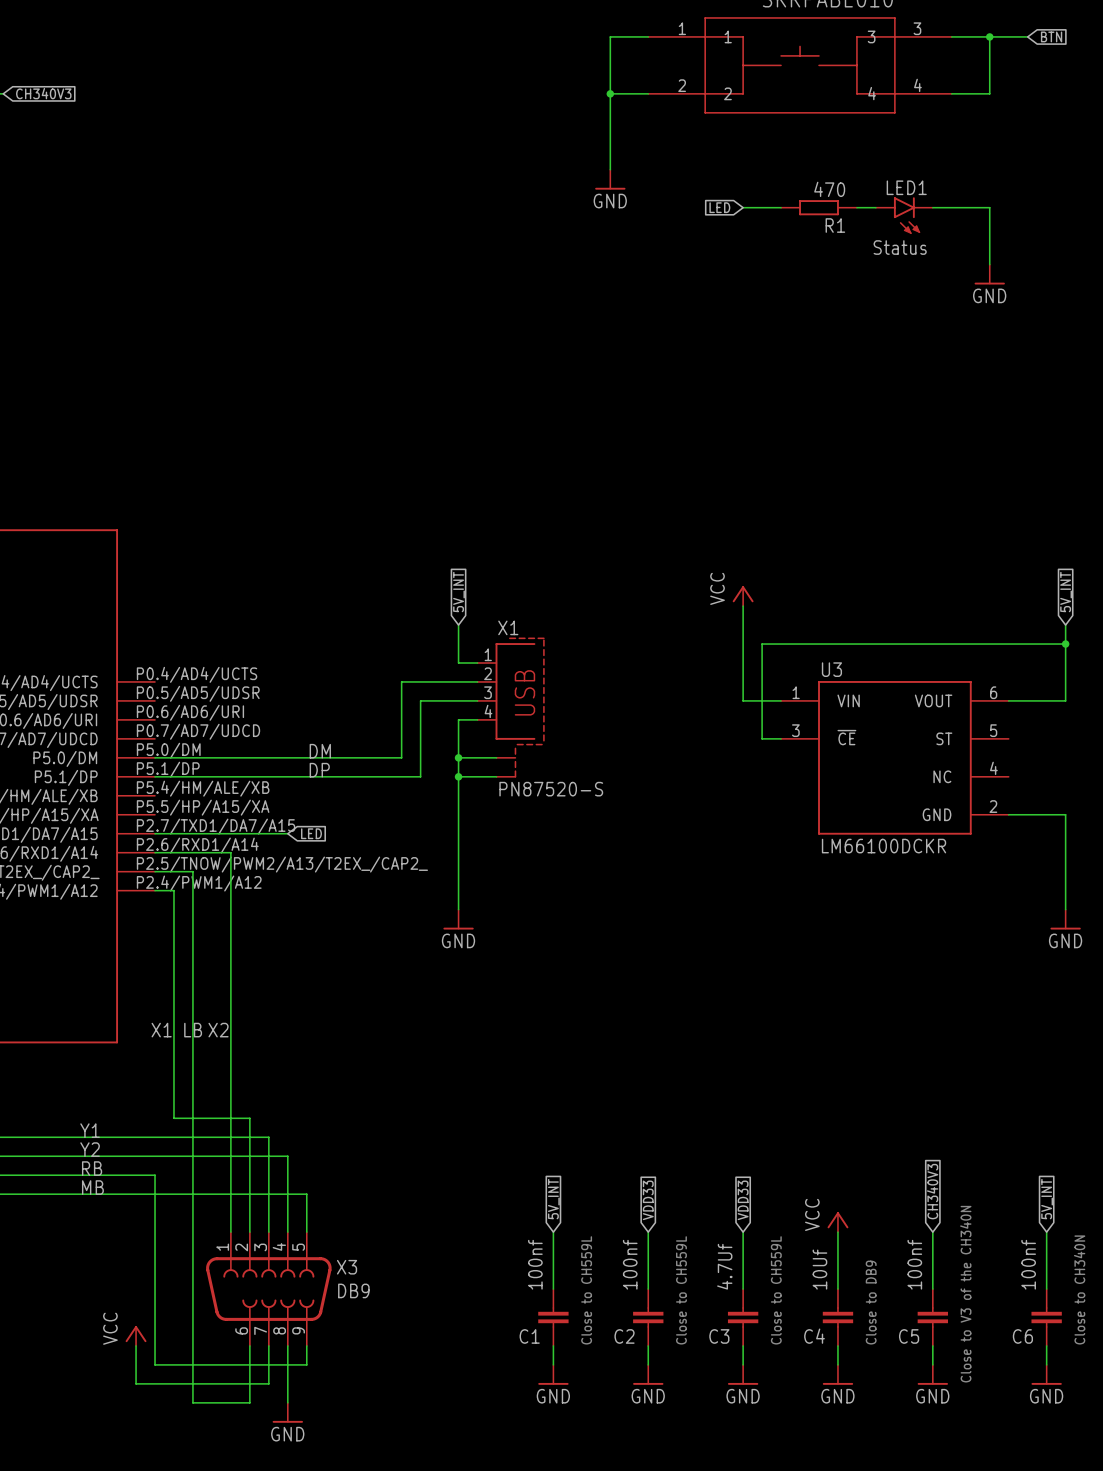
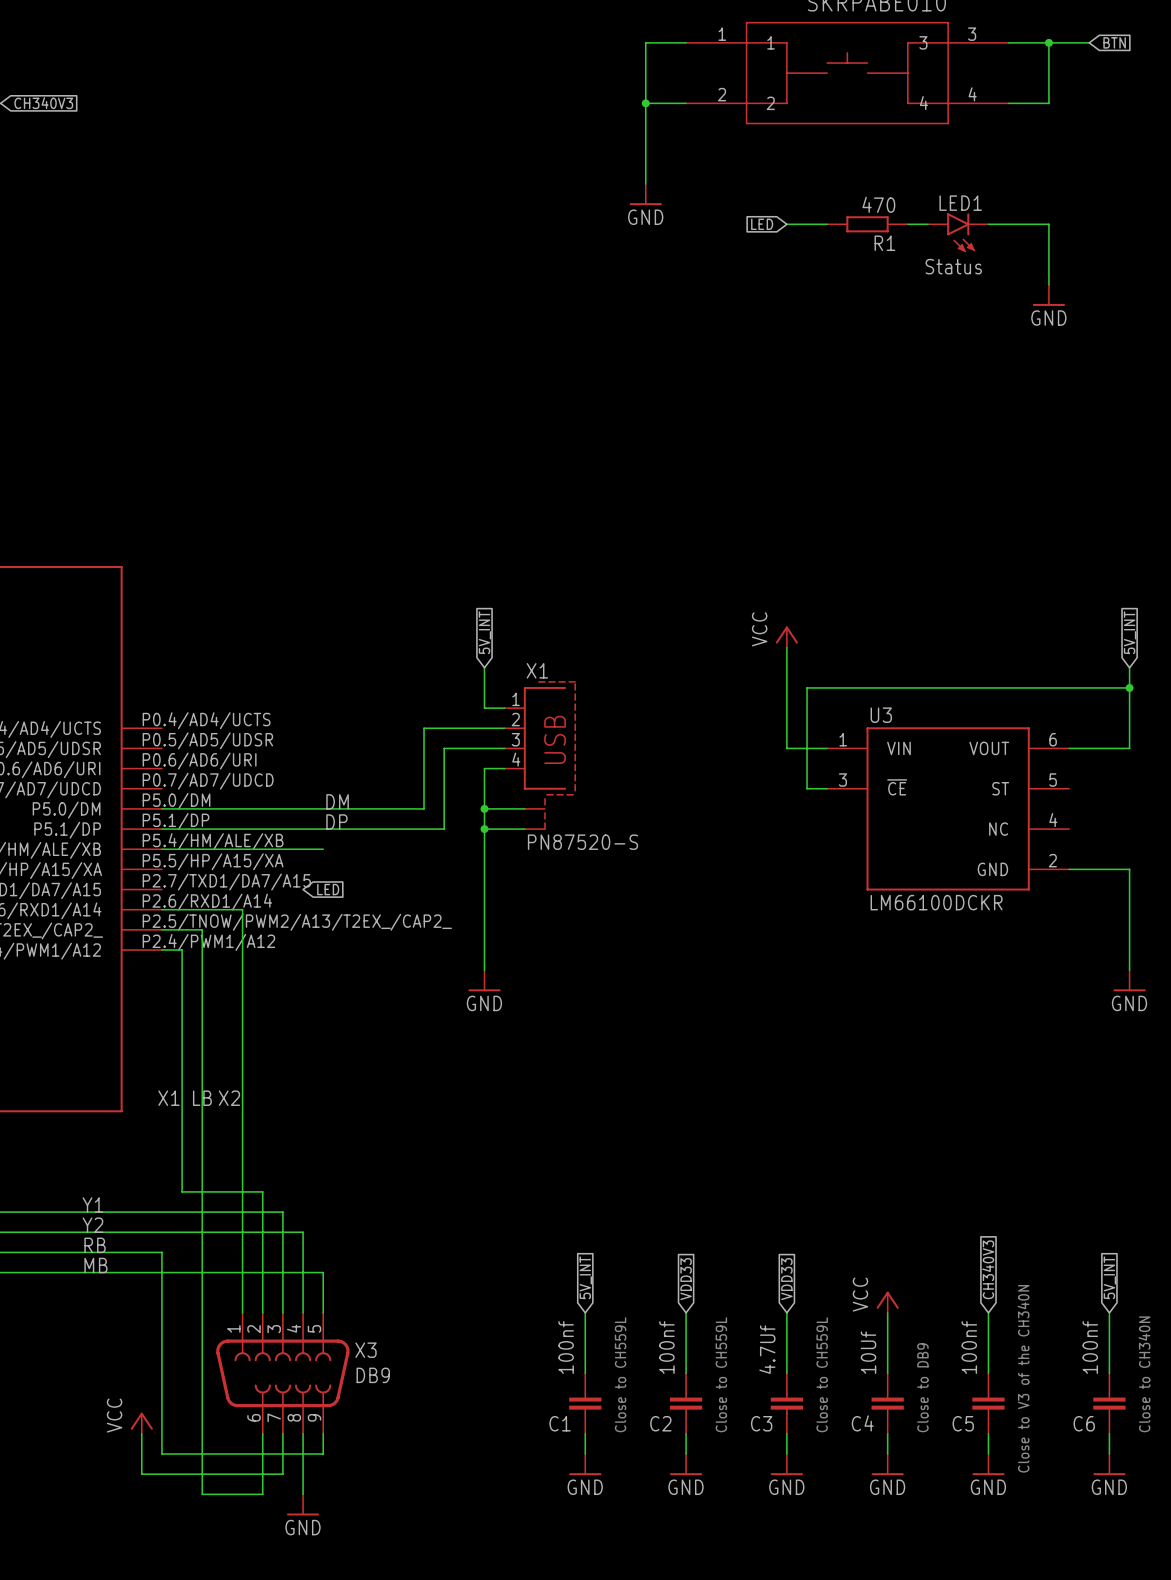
wire: none -> (161, 849) (323, 849)
wire: (155, 833) (287, 833) -> none

